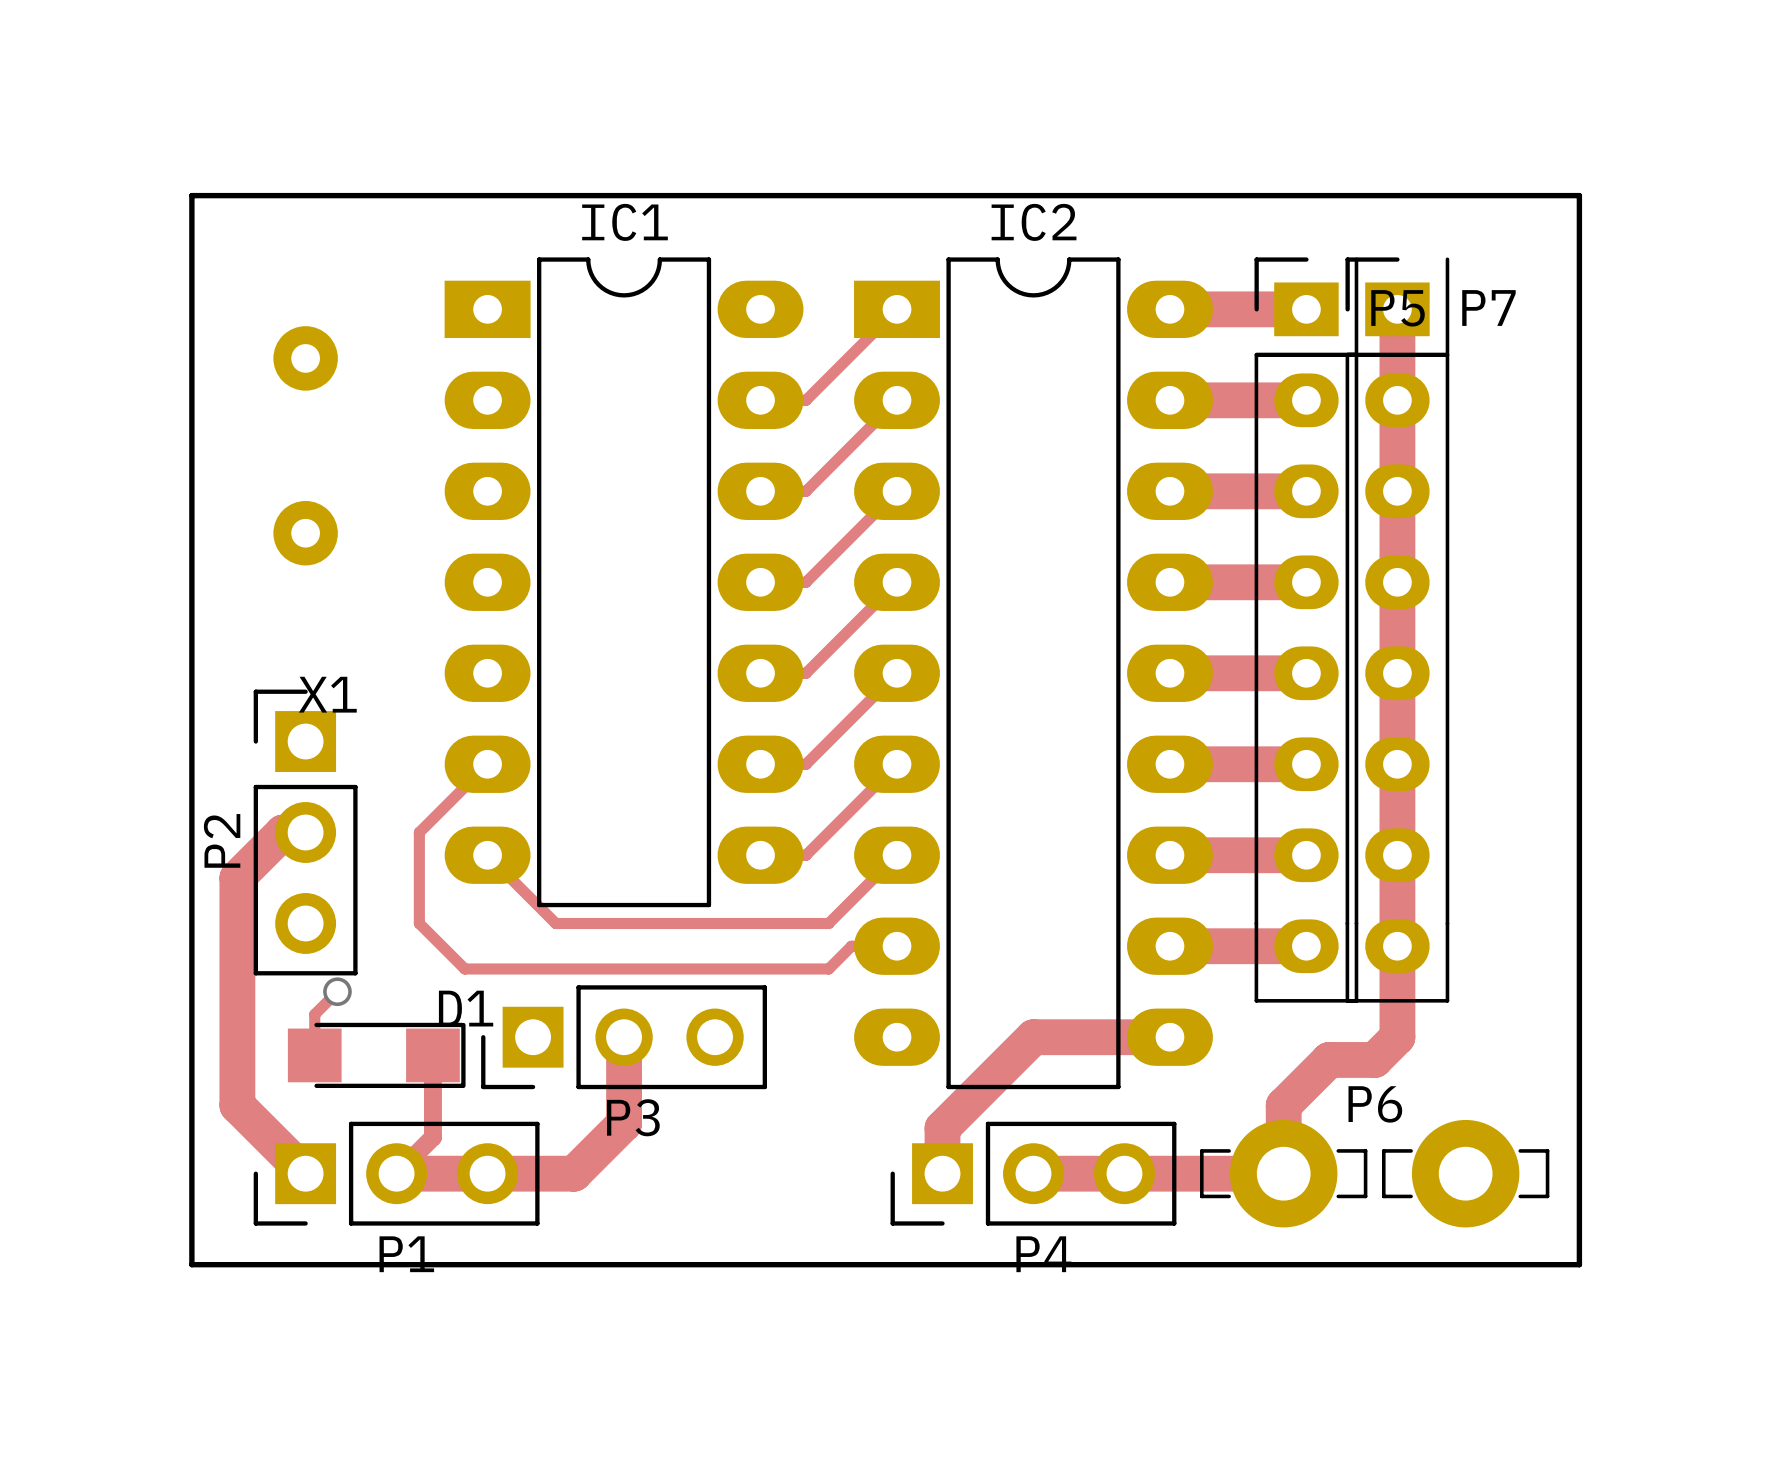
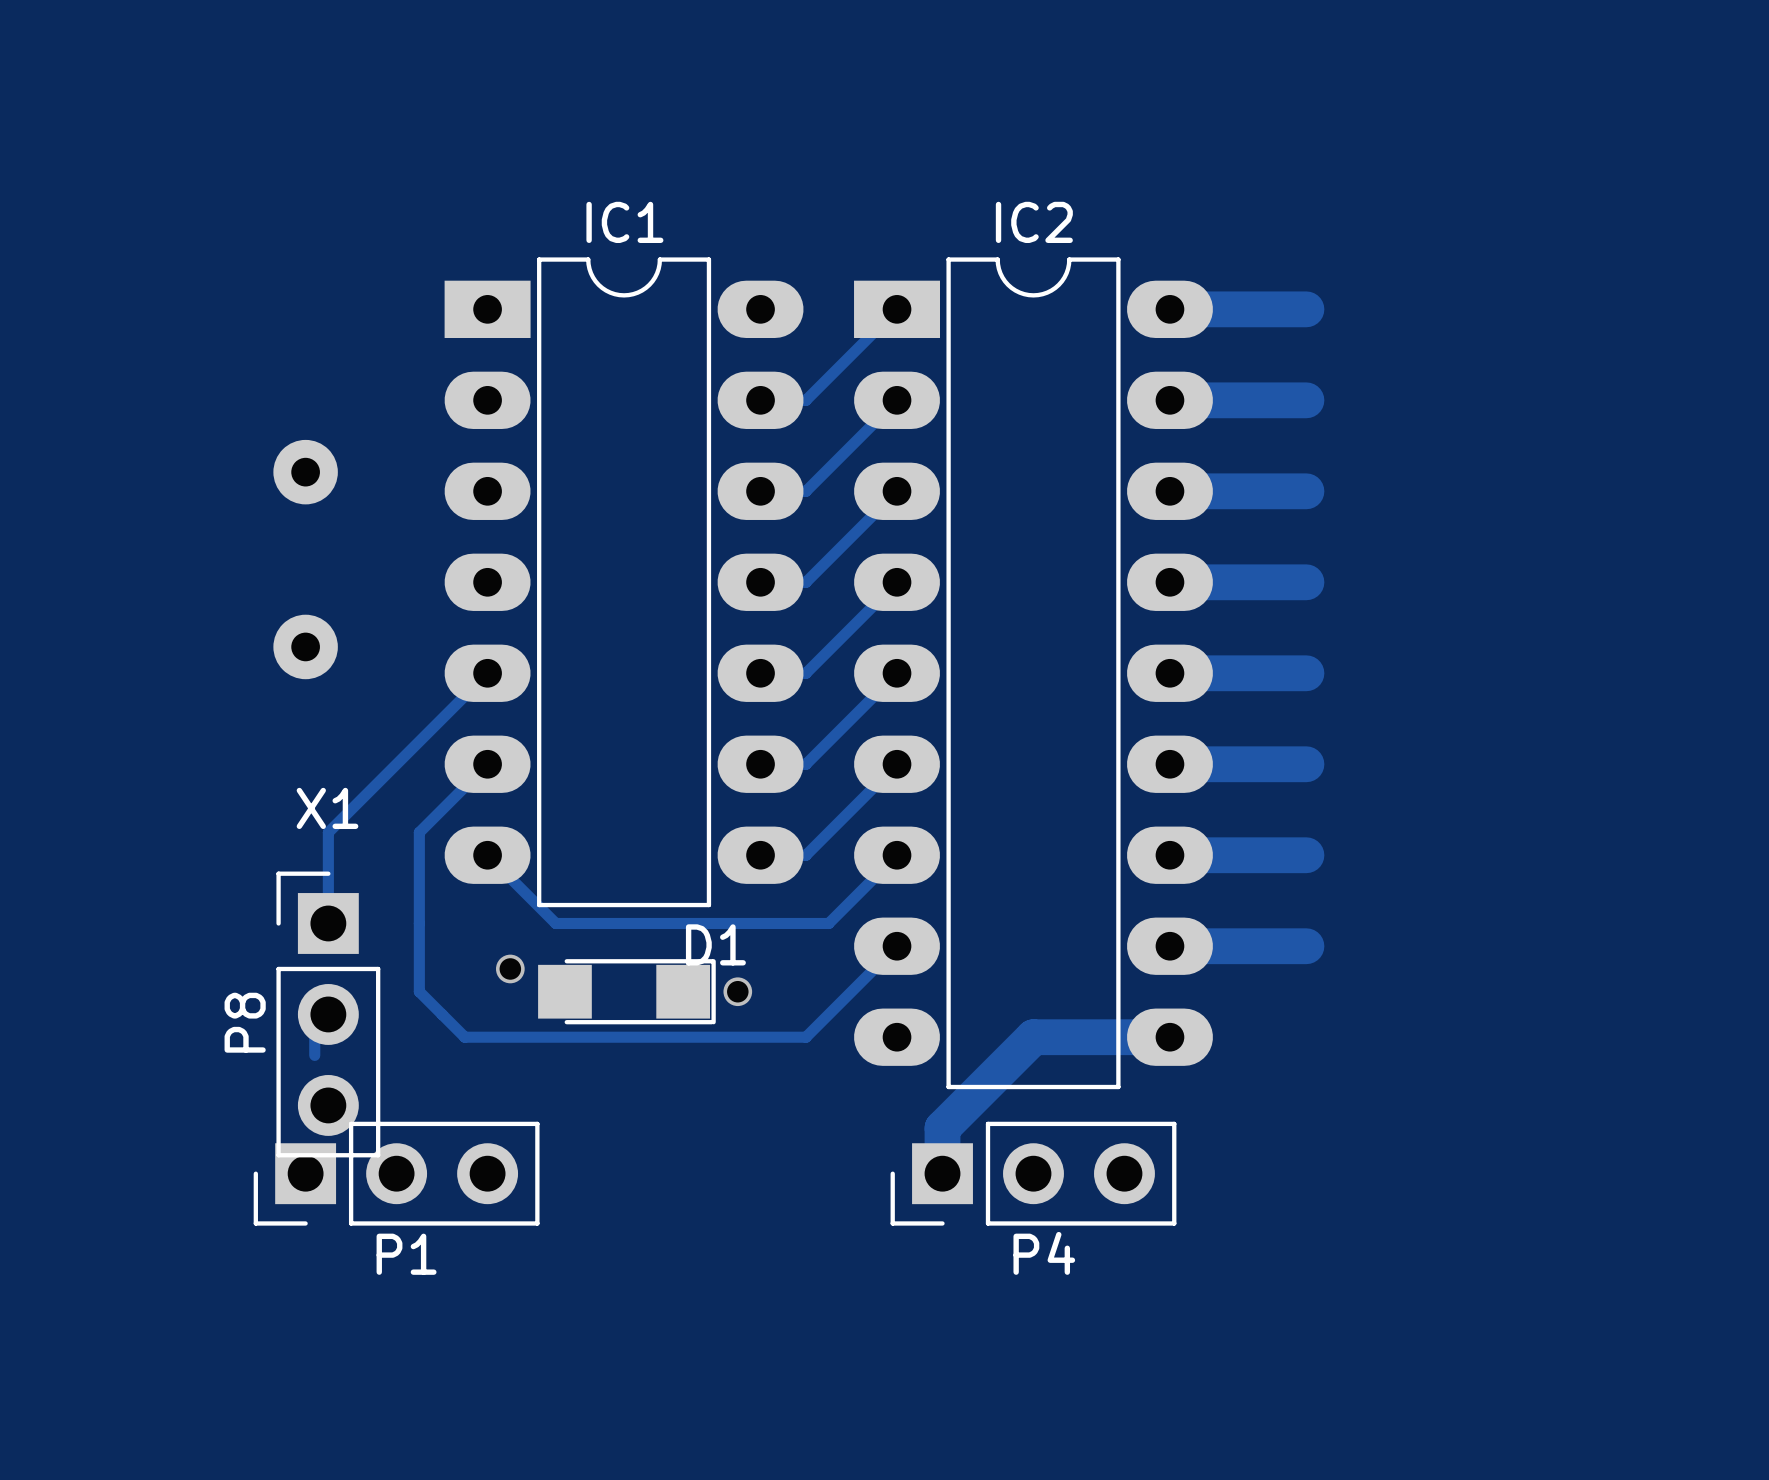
board edge: (191, 195) (191, 1264) (1579, 1264) (1579, 195) (191, 195) -> none
track: (1397, 309) (1397, 1037) (1374, 1059) (1329, 1059) (1283, 1105) (1283, 1173) (1033, 1173) -> none
X1 position: (305, 445) -> (305, 559)
P5: (1306, 630) -> none
P7: (1397, 630) -> none
track: none -> (487, 673) (328, 832) (328, 923)
track: (305, 832) (282, 832) (237, 877) (237, 1105) (305, 1173) -> none
P2: (305, 832) -> none
track: (419, 923) (464, 968) (828, 968) (851, 946) (897, 946) -> (419, 923) (419, 991) (464, 1037) (806, 1037) (897, 946)
via position: (337, 991) -> (510, 968)
via: none -> (737, 991)
P8: none -> (328, 1014)
track: (624, 1037) (624, 1123) (574, 1173) (396, 1173) (432, 1137) (432, 1055) -> none
P3: (624, 1037) -> none
D1 position: (376, 1055) -> (626, 991)
P6: (1374, 1173) -> none

